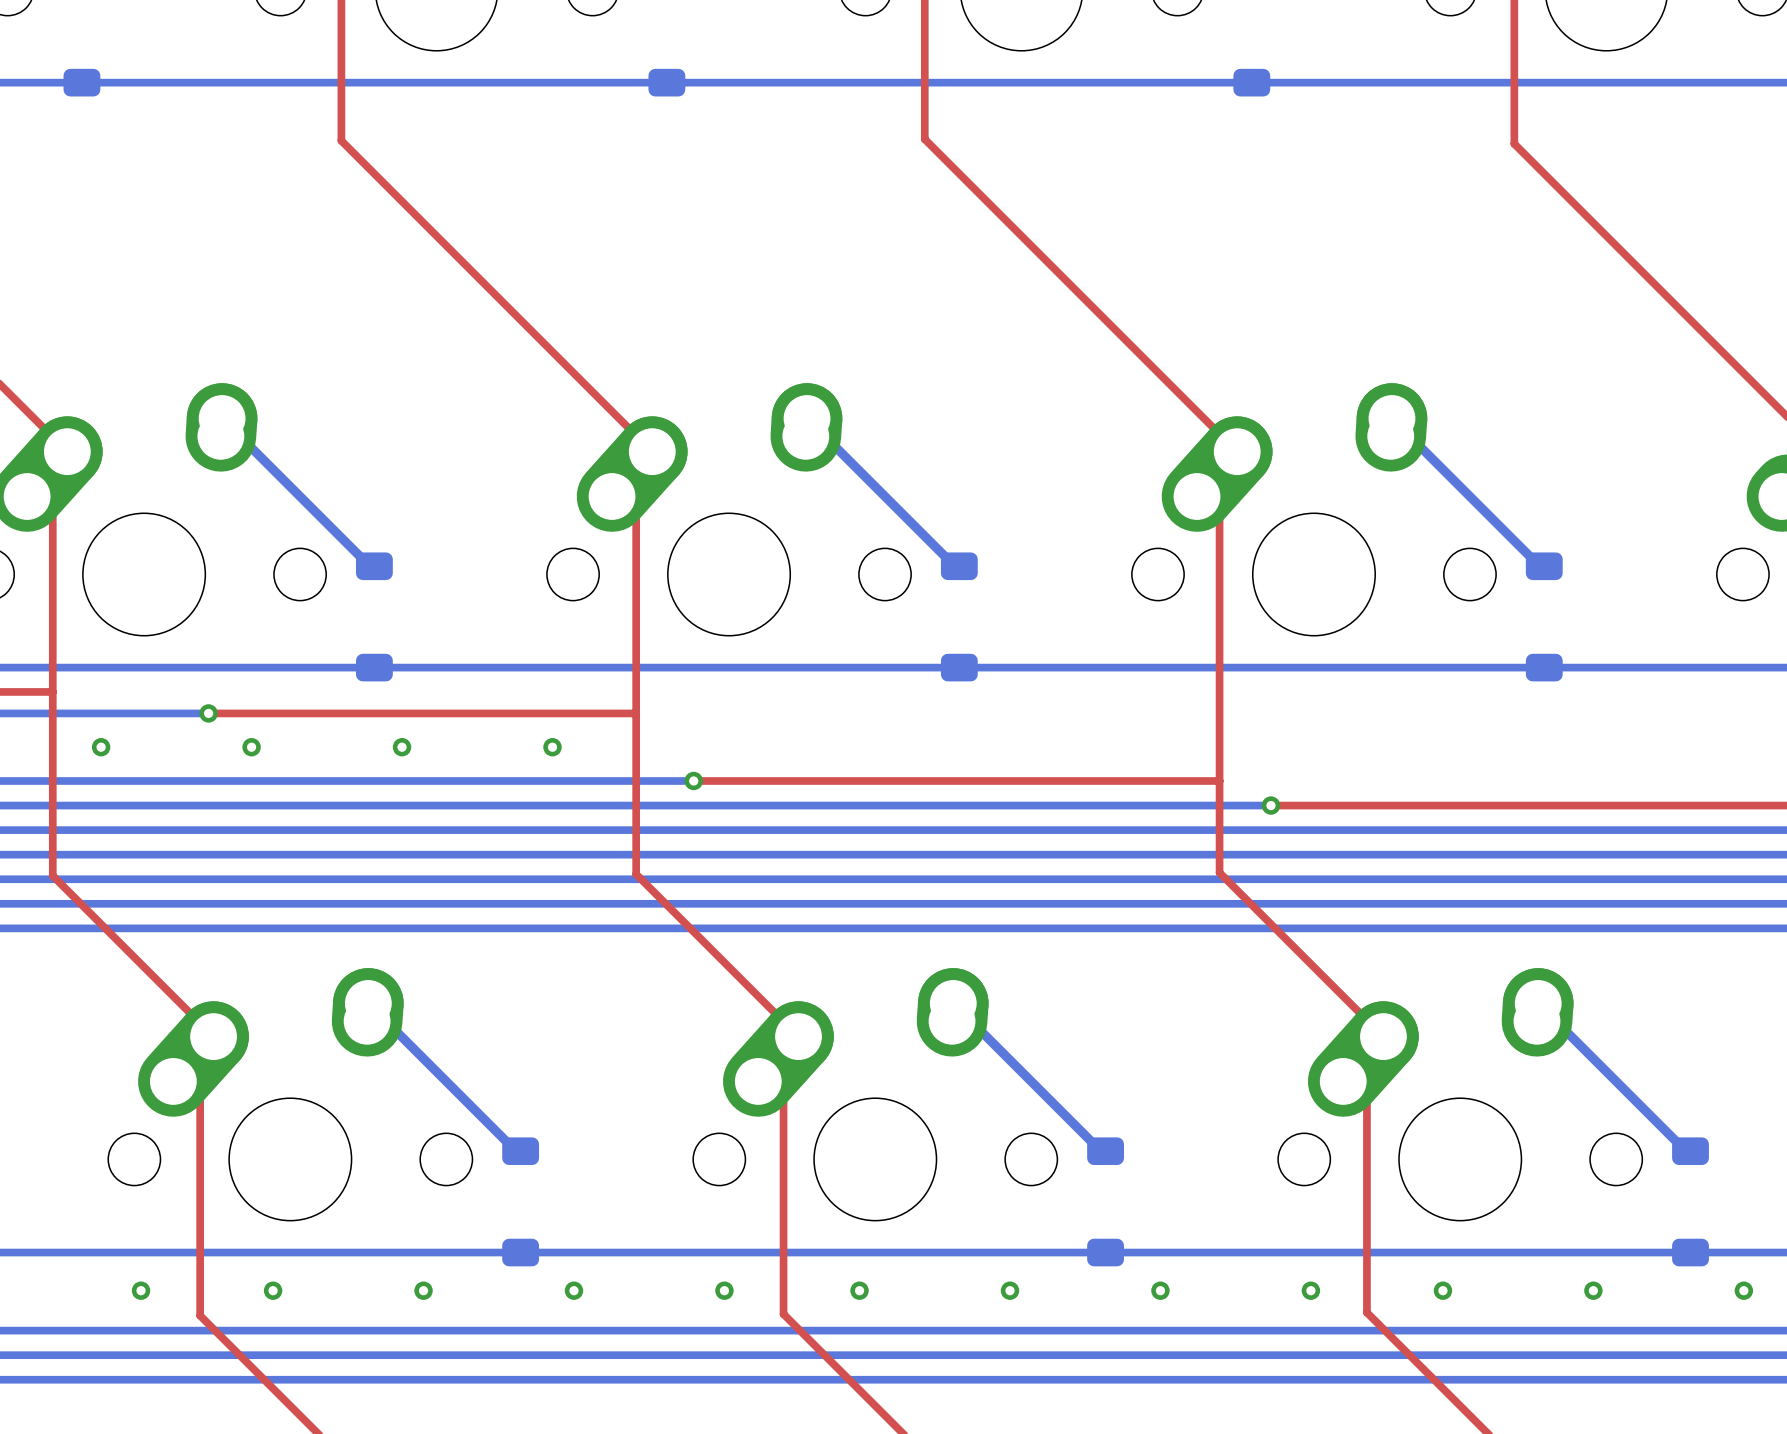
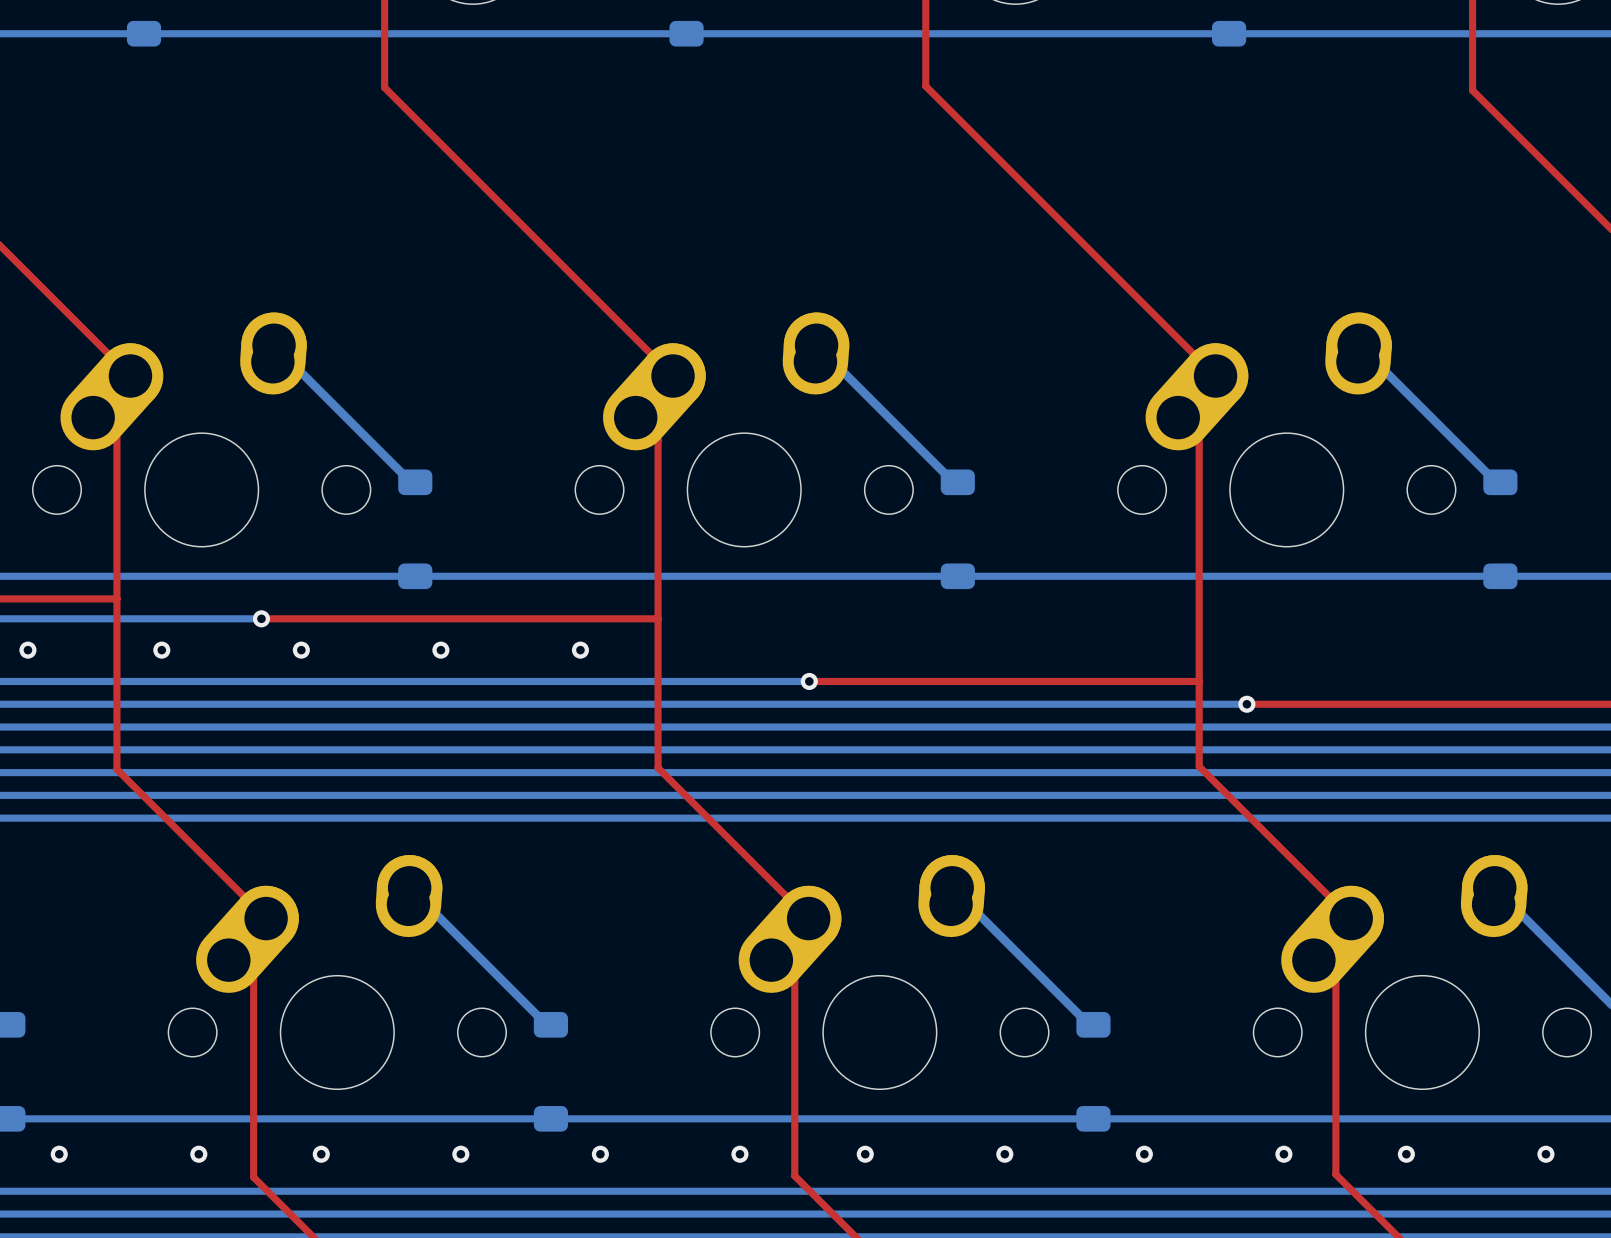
bottom track: none -> (711, 681) (809, 681)
top track: (693, 780) (799, 780) -> none
via position: (693, 780) -> (809, 681)

